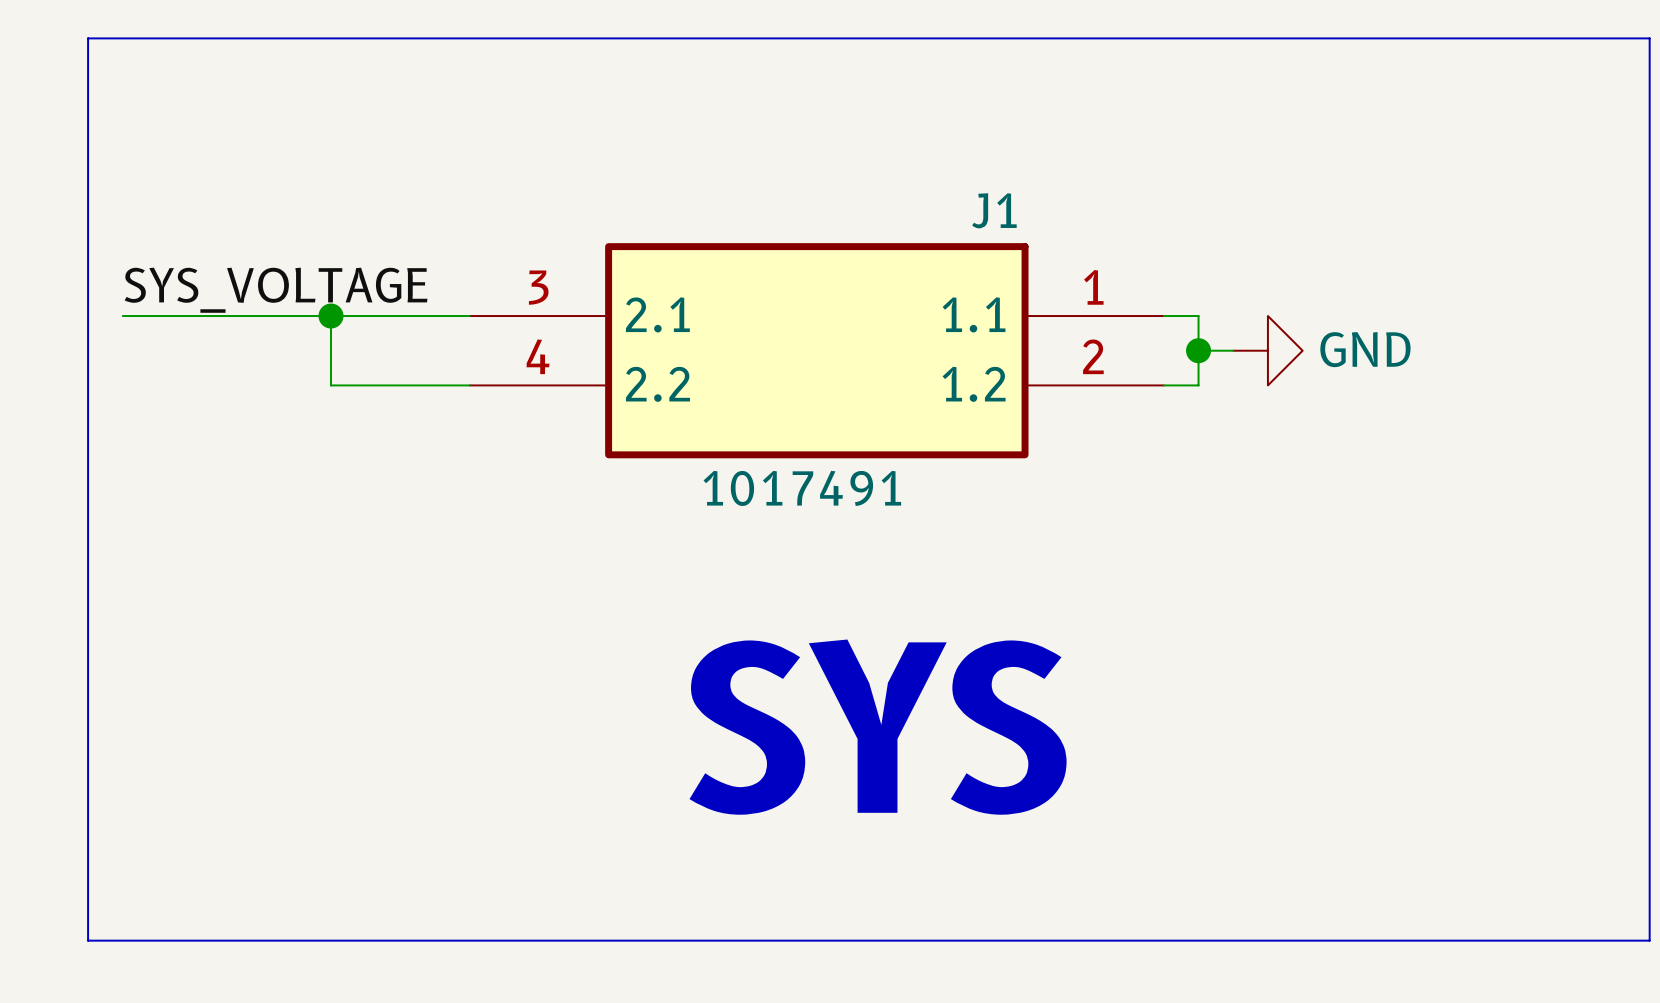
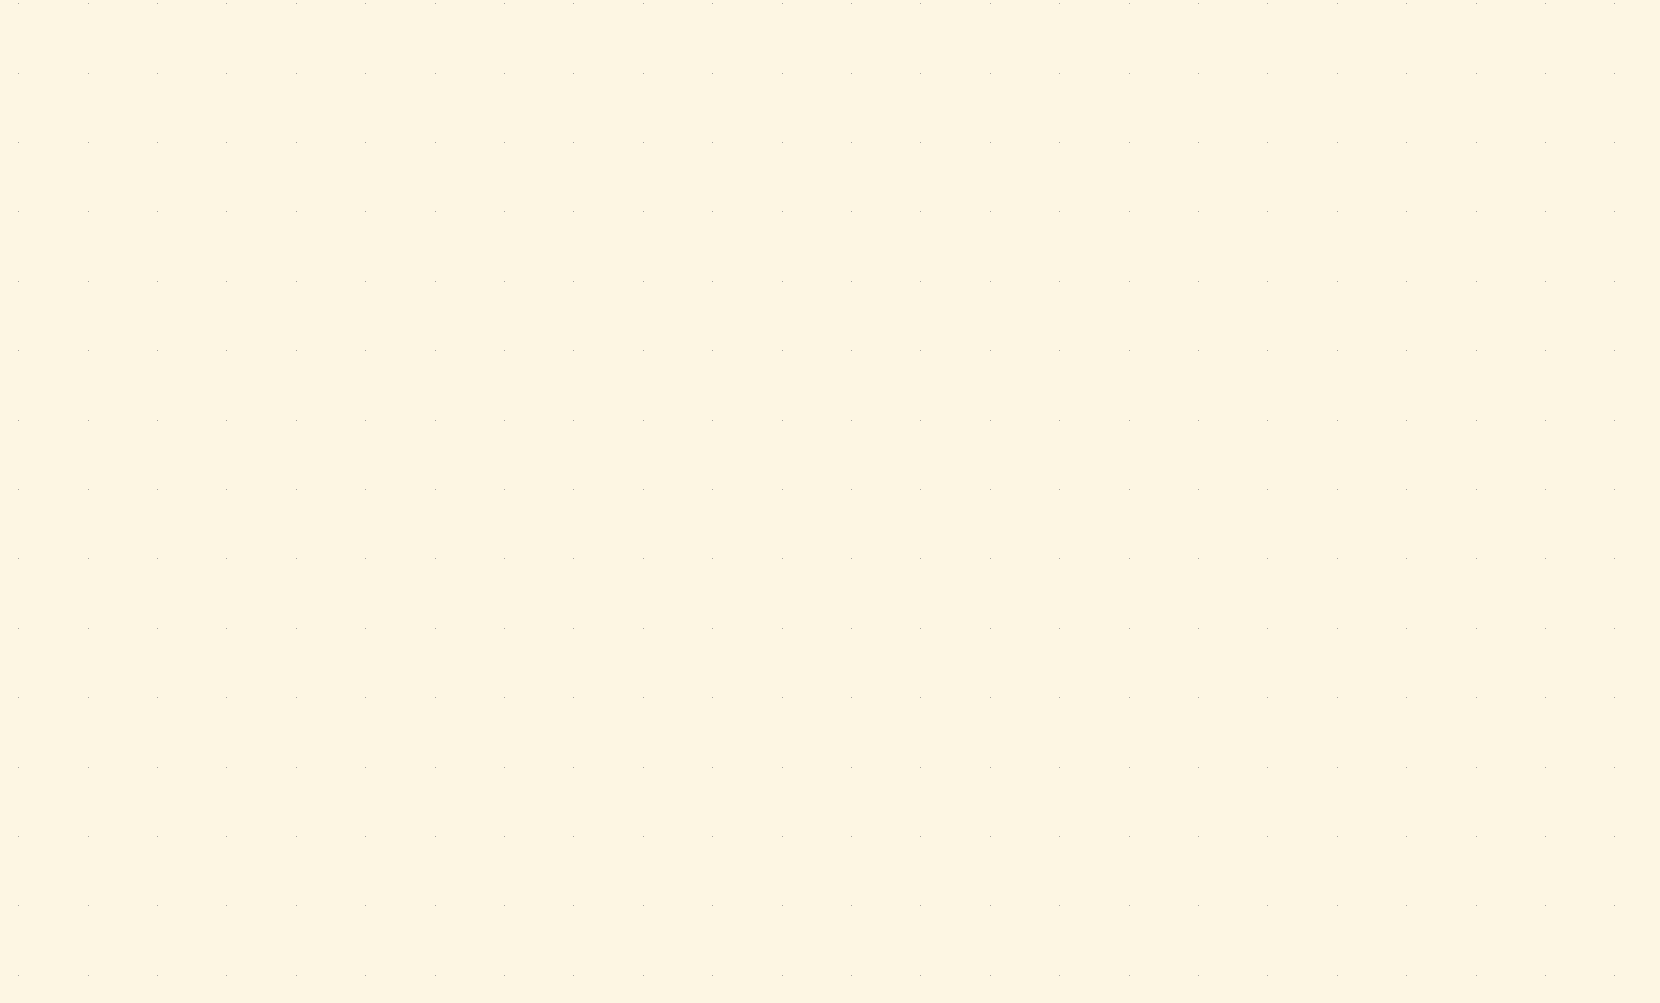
line: (88, 38) (1649, 38) (1649, 940) (88, 940) (88, 38) -> none
label: SYS_VOLTAGE (276, 290) -> none
wire: (122, 316) (469, 316) -> none
wire: (330, 316) (330, 385) (469, 385) -> none
junction: (330, 316) -> none
wire: (1163, 316) (1198, 316) (1198, 385) (1163, 385) -> none
J1: 1017491 (816, 350) -> none
wire: (1198, 350) (1233, 350) -> none
junction: (1198, 350) -> none
power symbol: GND (1267, 350) -> none
text: SYS (878, 727) -> none

